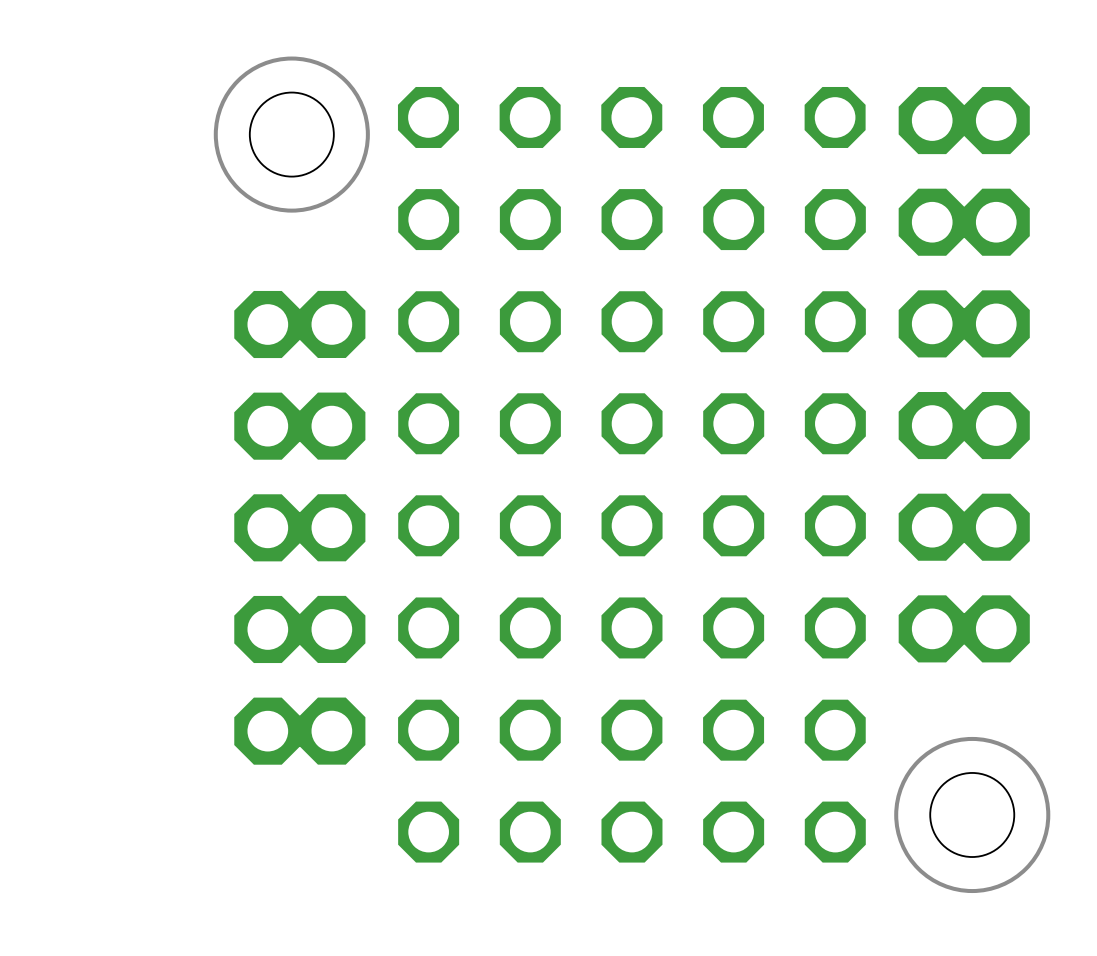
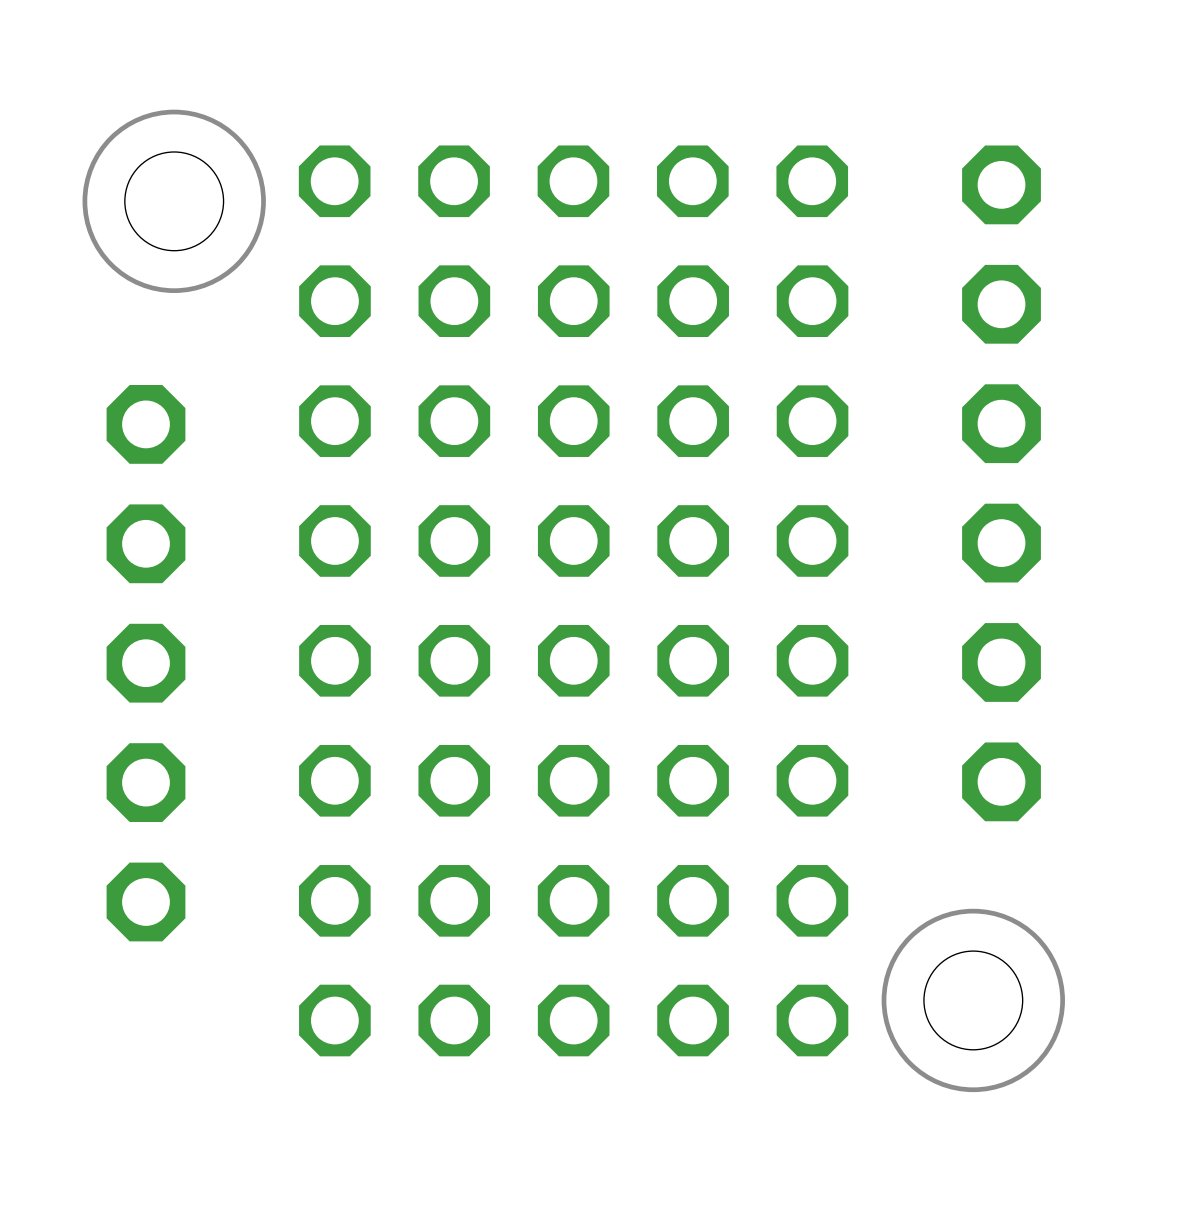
part: (932, 374) -> none
part: (331, 527) -> none

